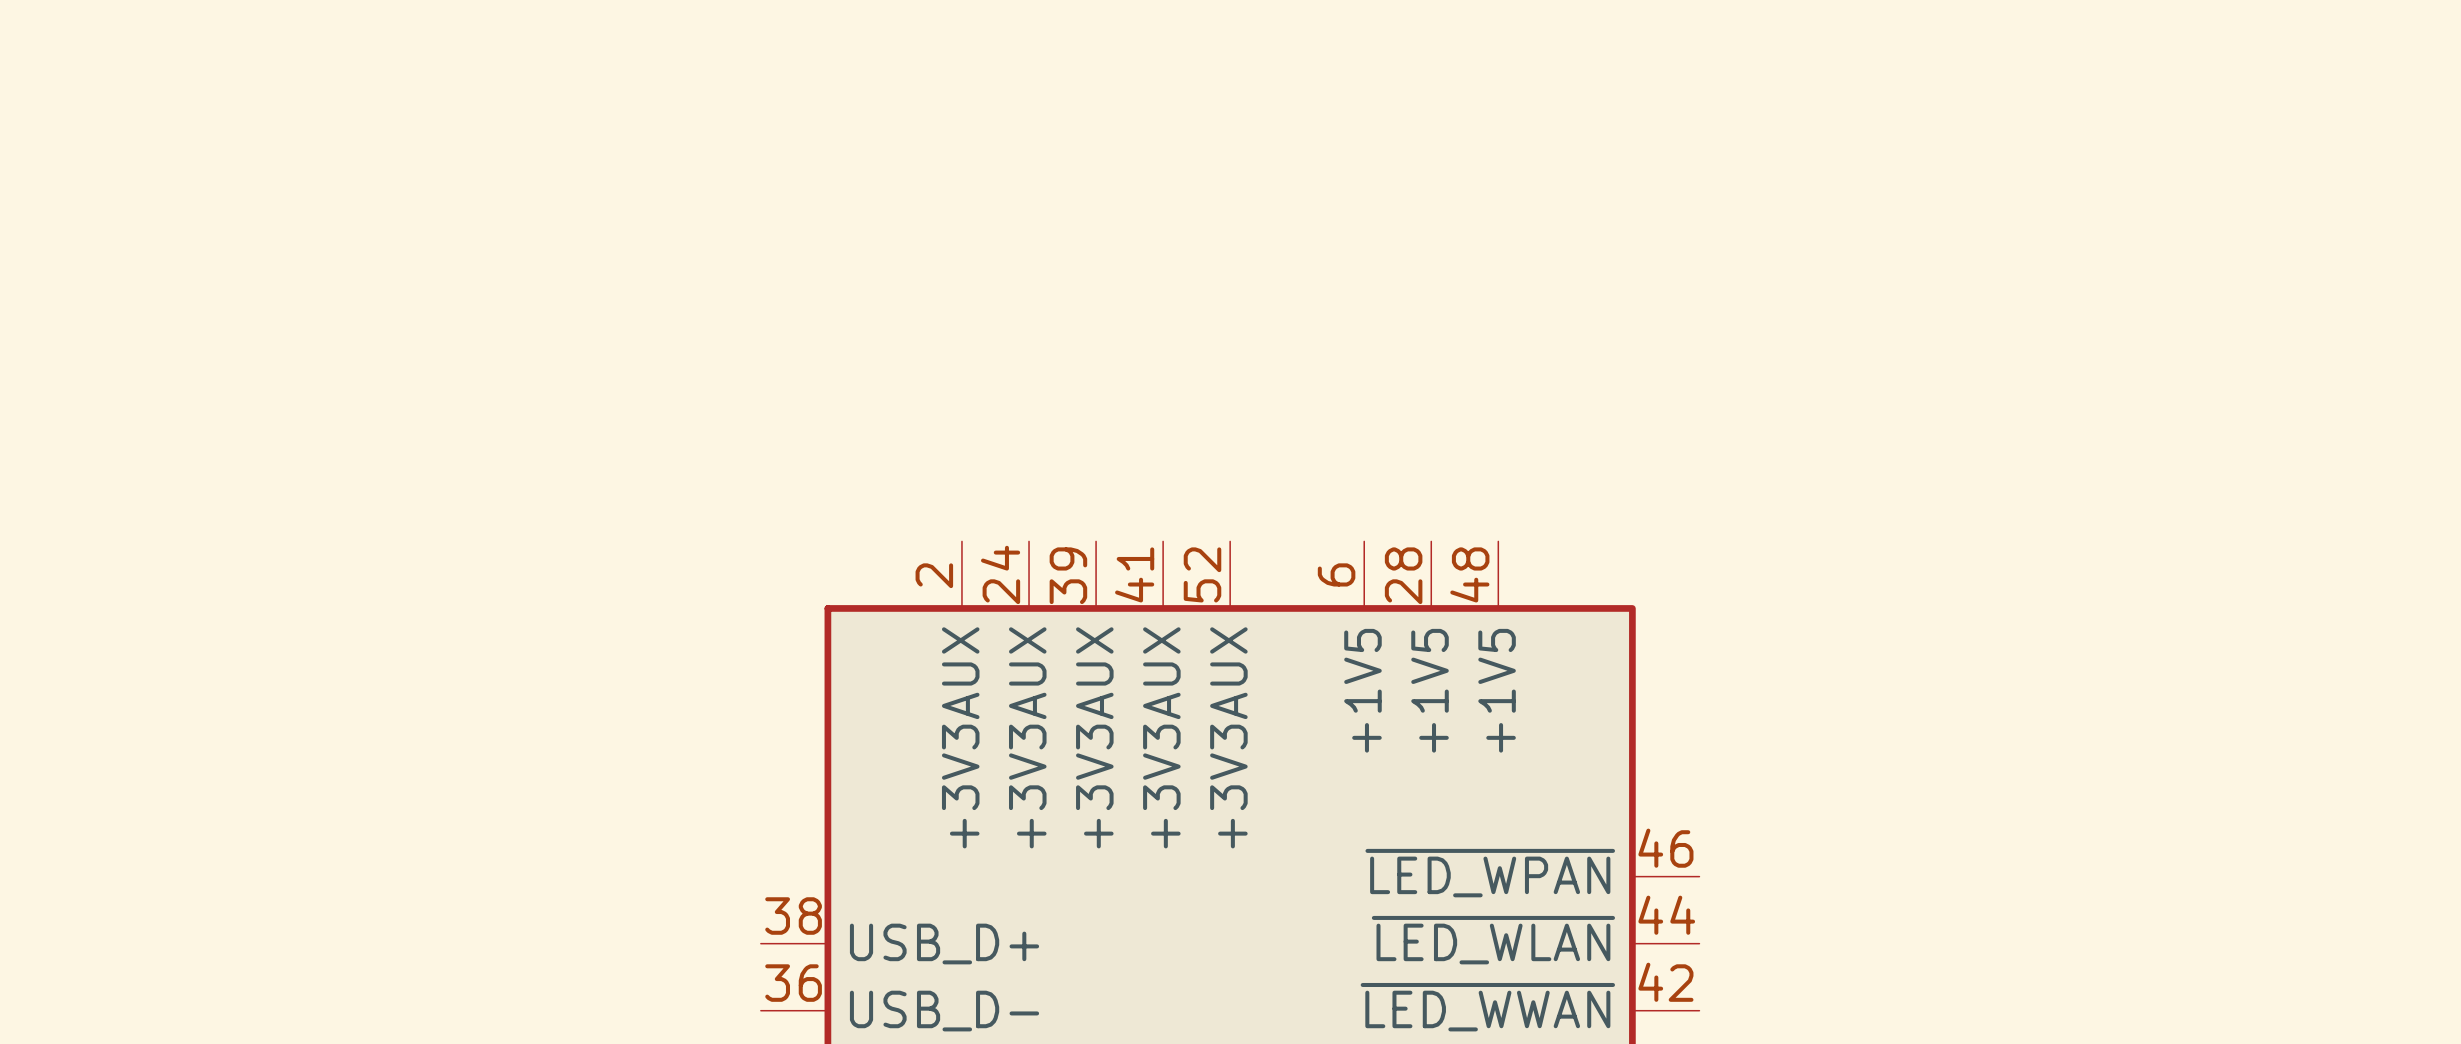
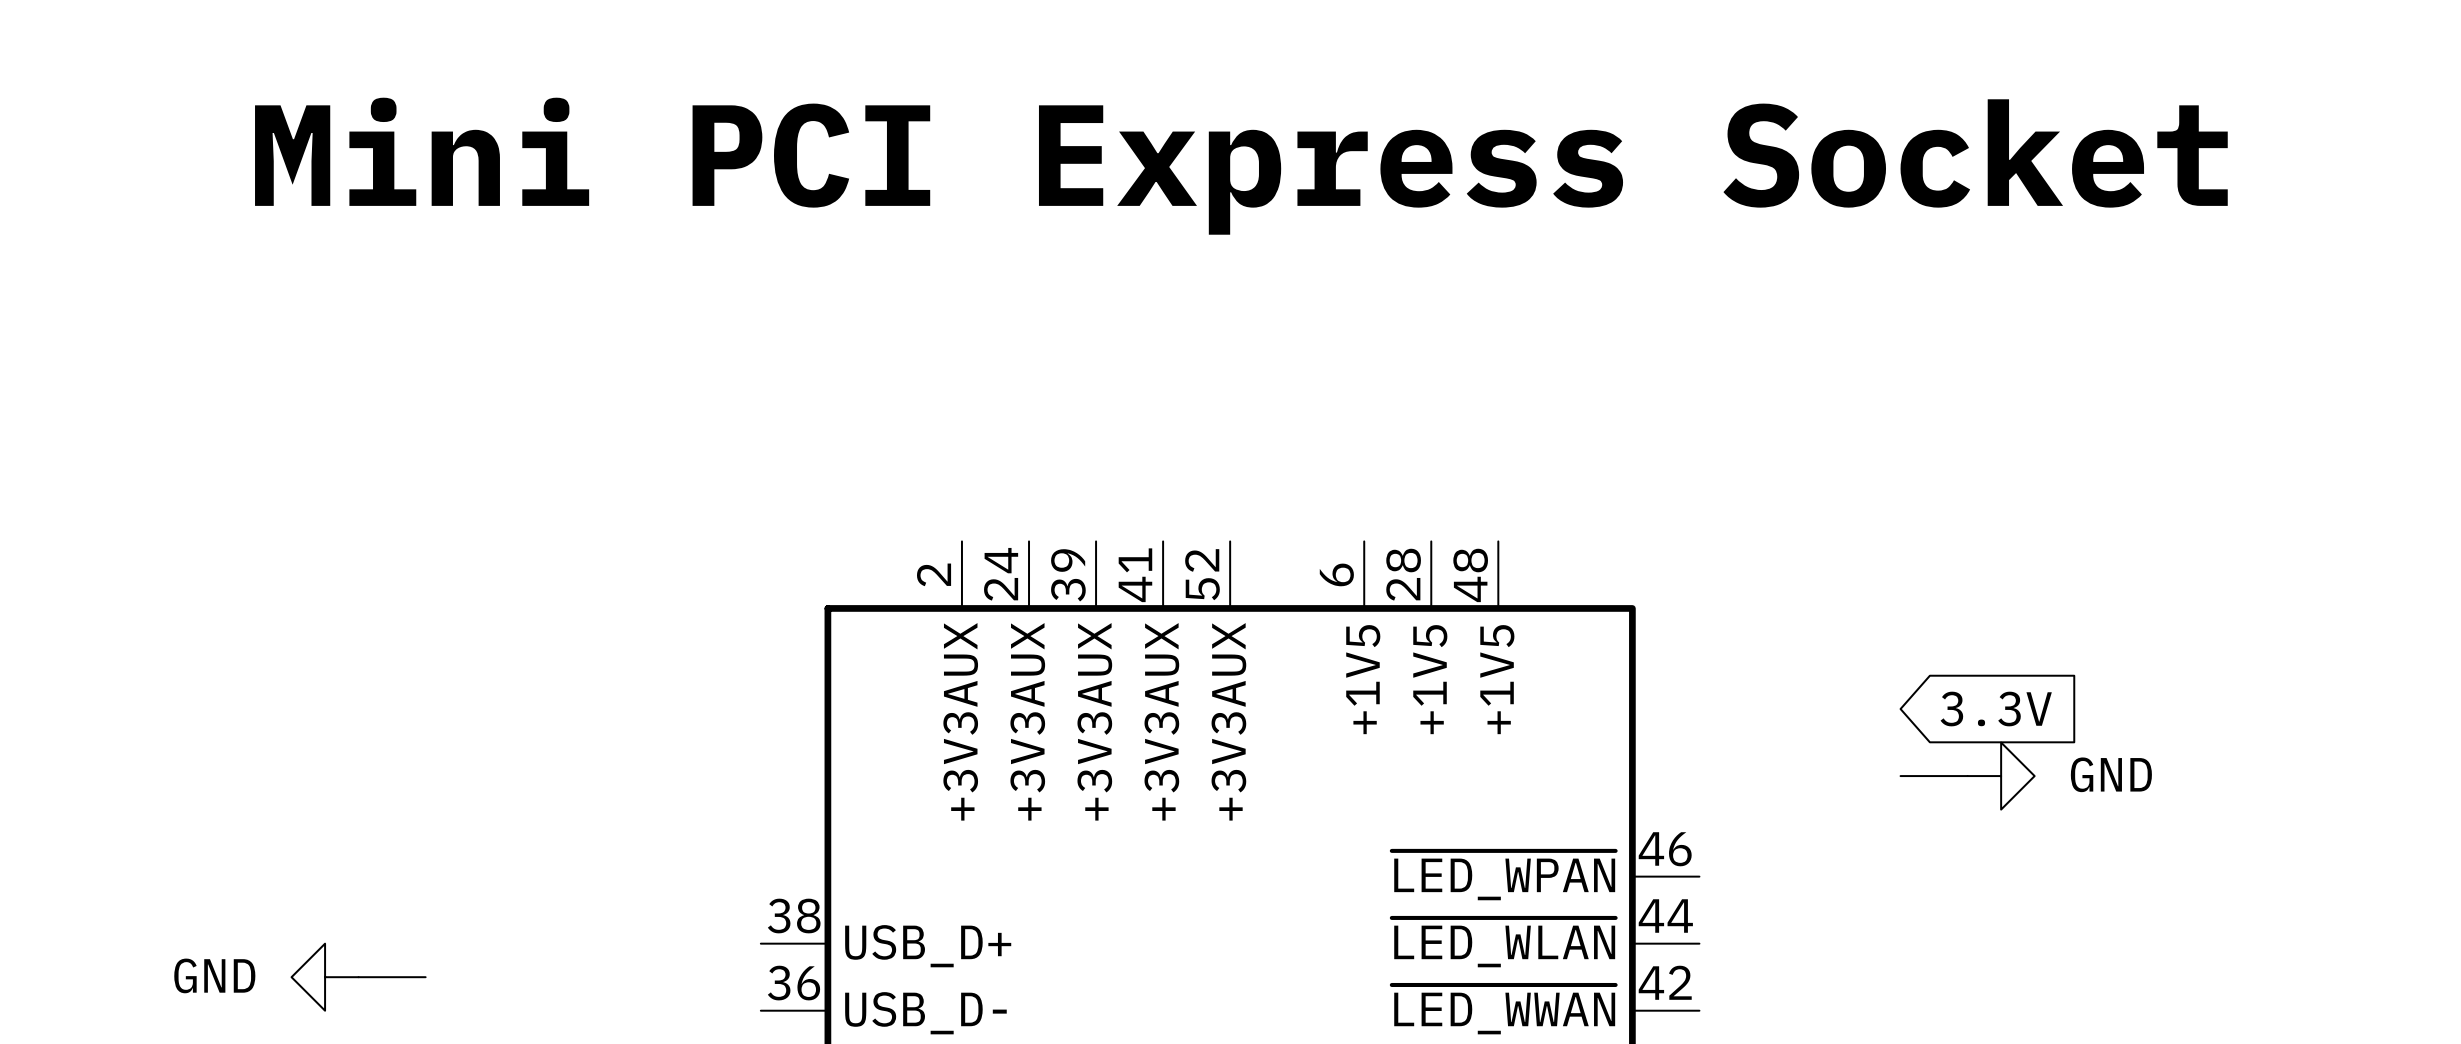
text: none -> Mini PCI Express Socket (1241, 166)
global label: none -> 3.3V (1996, 709)
wire: none -> (1900, 776) (1967, 776)
power symbol: none -> GND (2001, 776)
power symbol: none -> GND (325, 977)
wire: none -> (358, 977) (425, 977)

